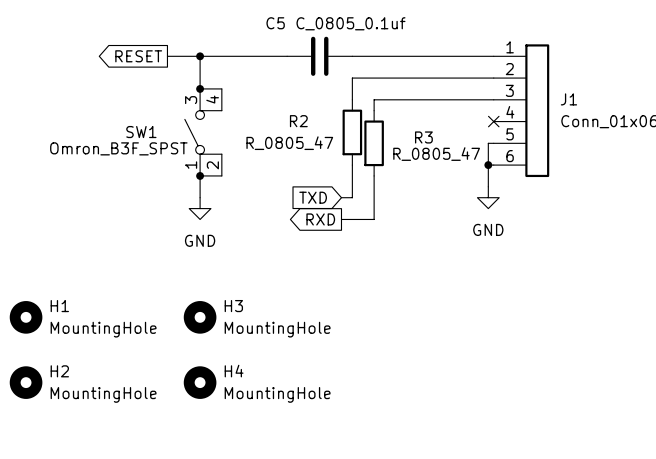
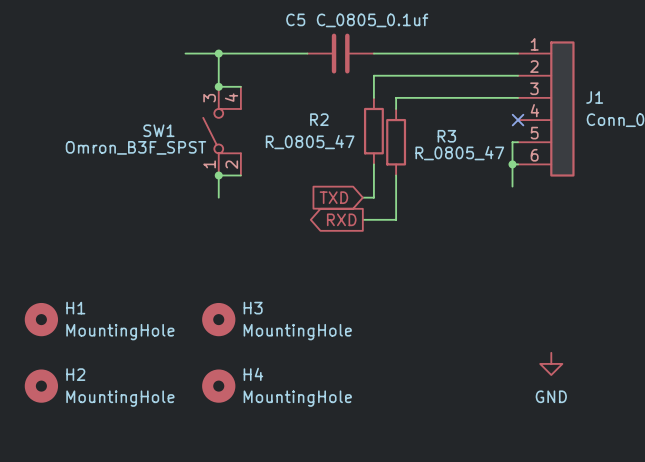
global label: RESET (138, 56) -> none
power symbol position: GND (488, 197) -> GND (551, 363)
power symbol: GND (200, 208) -> none

